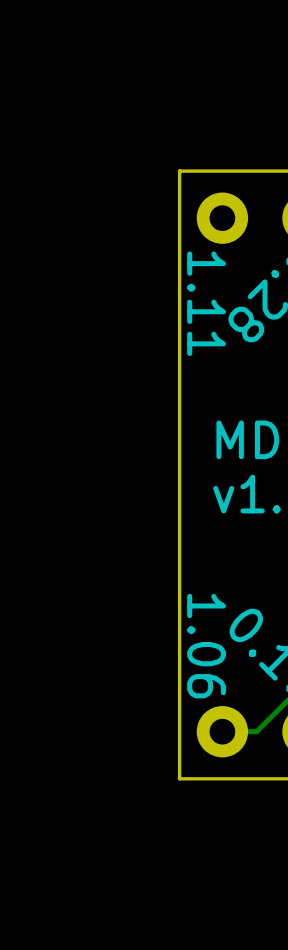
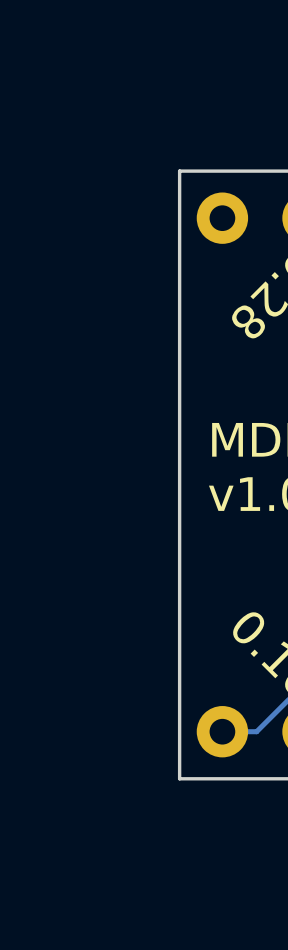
text: 1.11 (206, 303) -> none
text: 1.06 (206, 646) -> none

